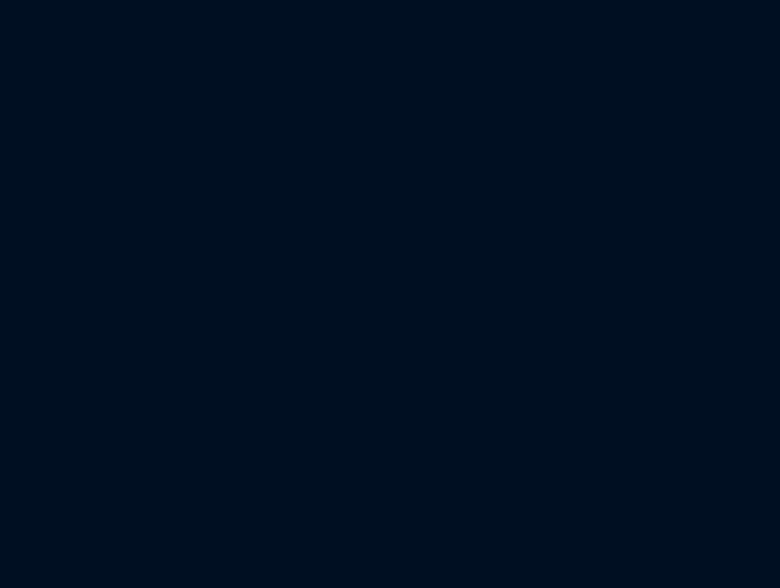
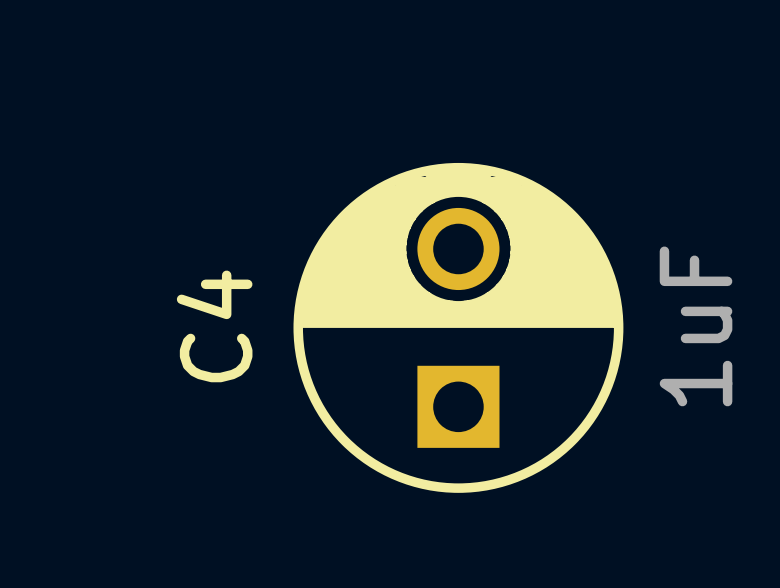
C4: none -> 1uF (458, 327)

